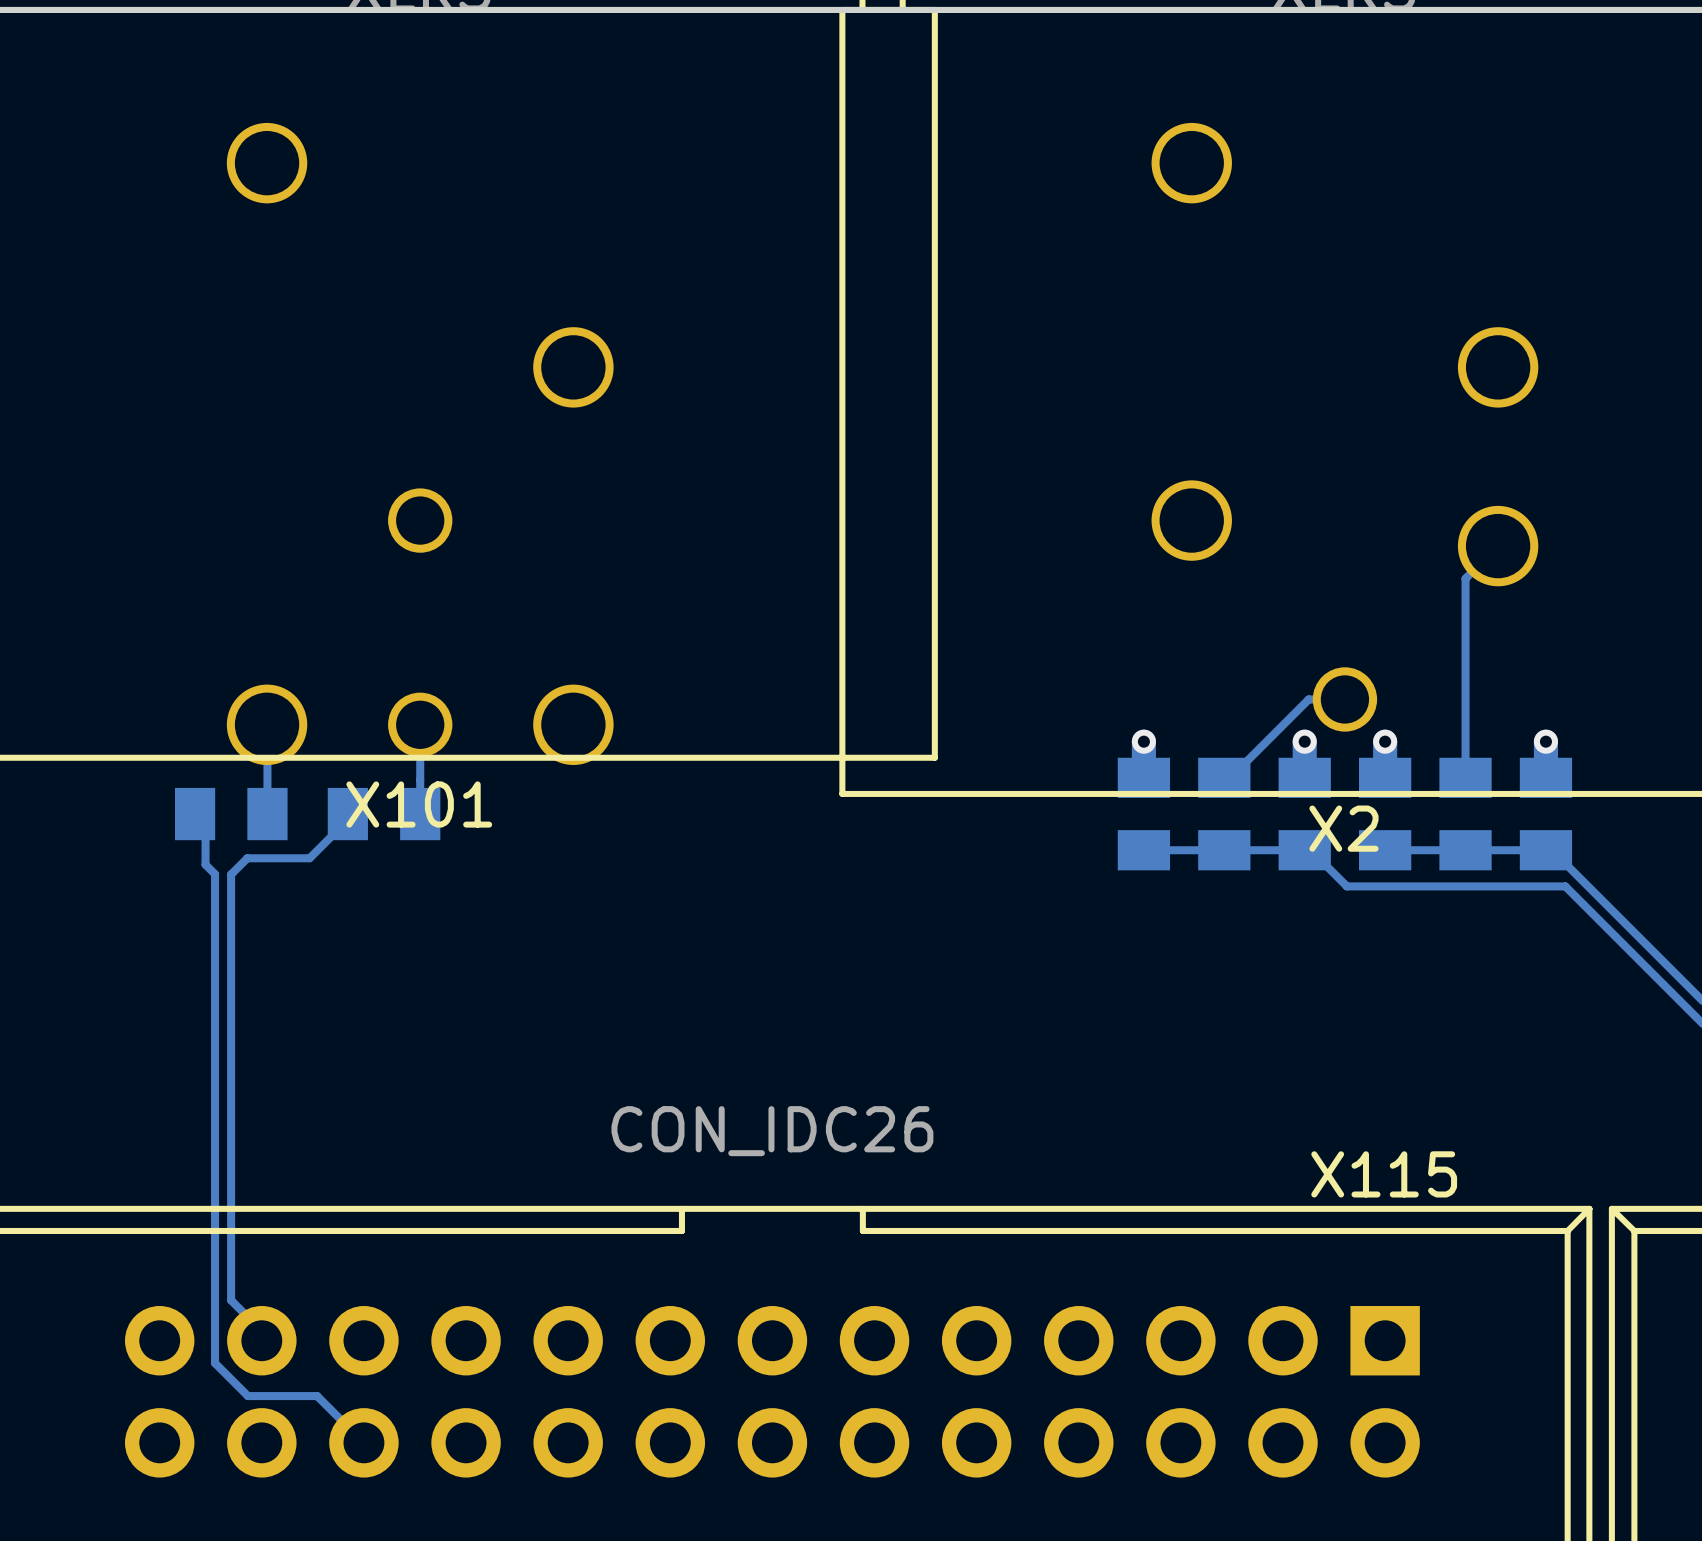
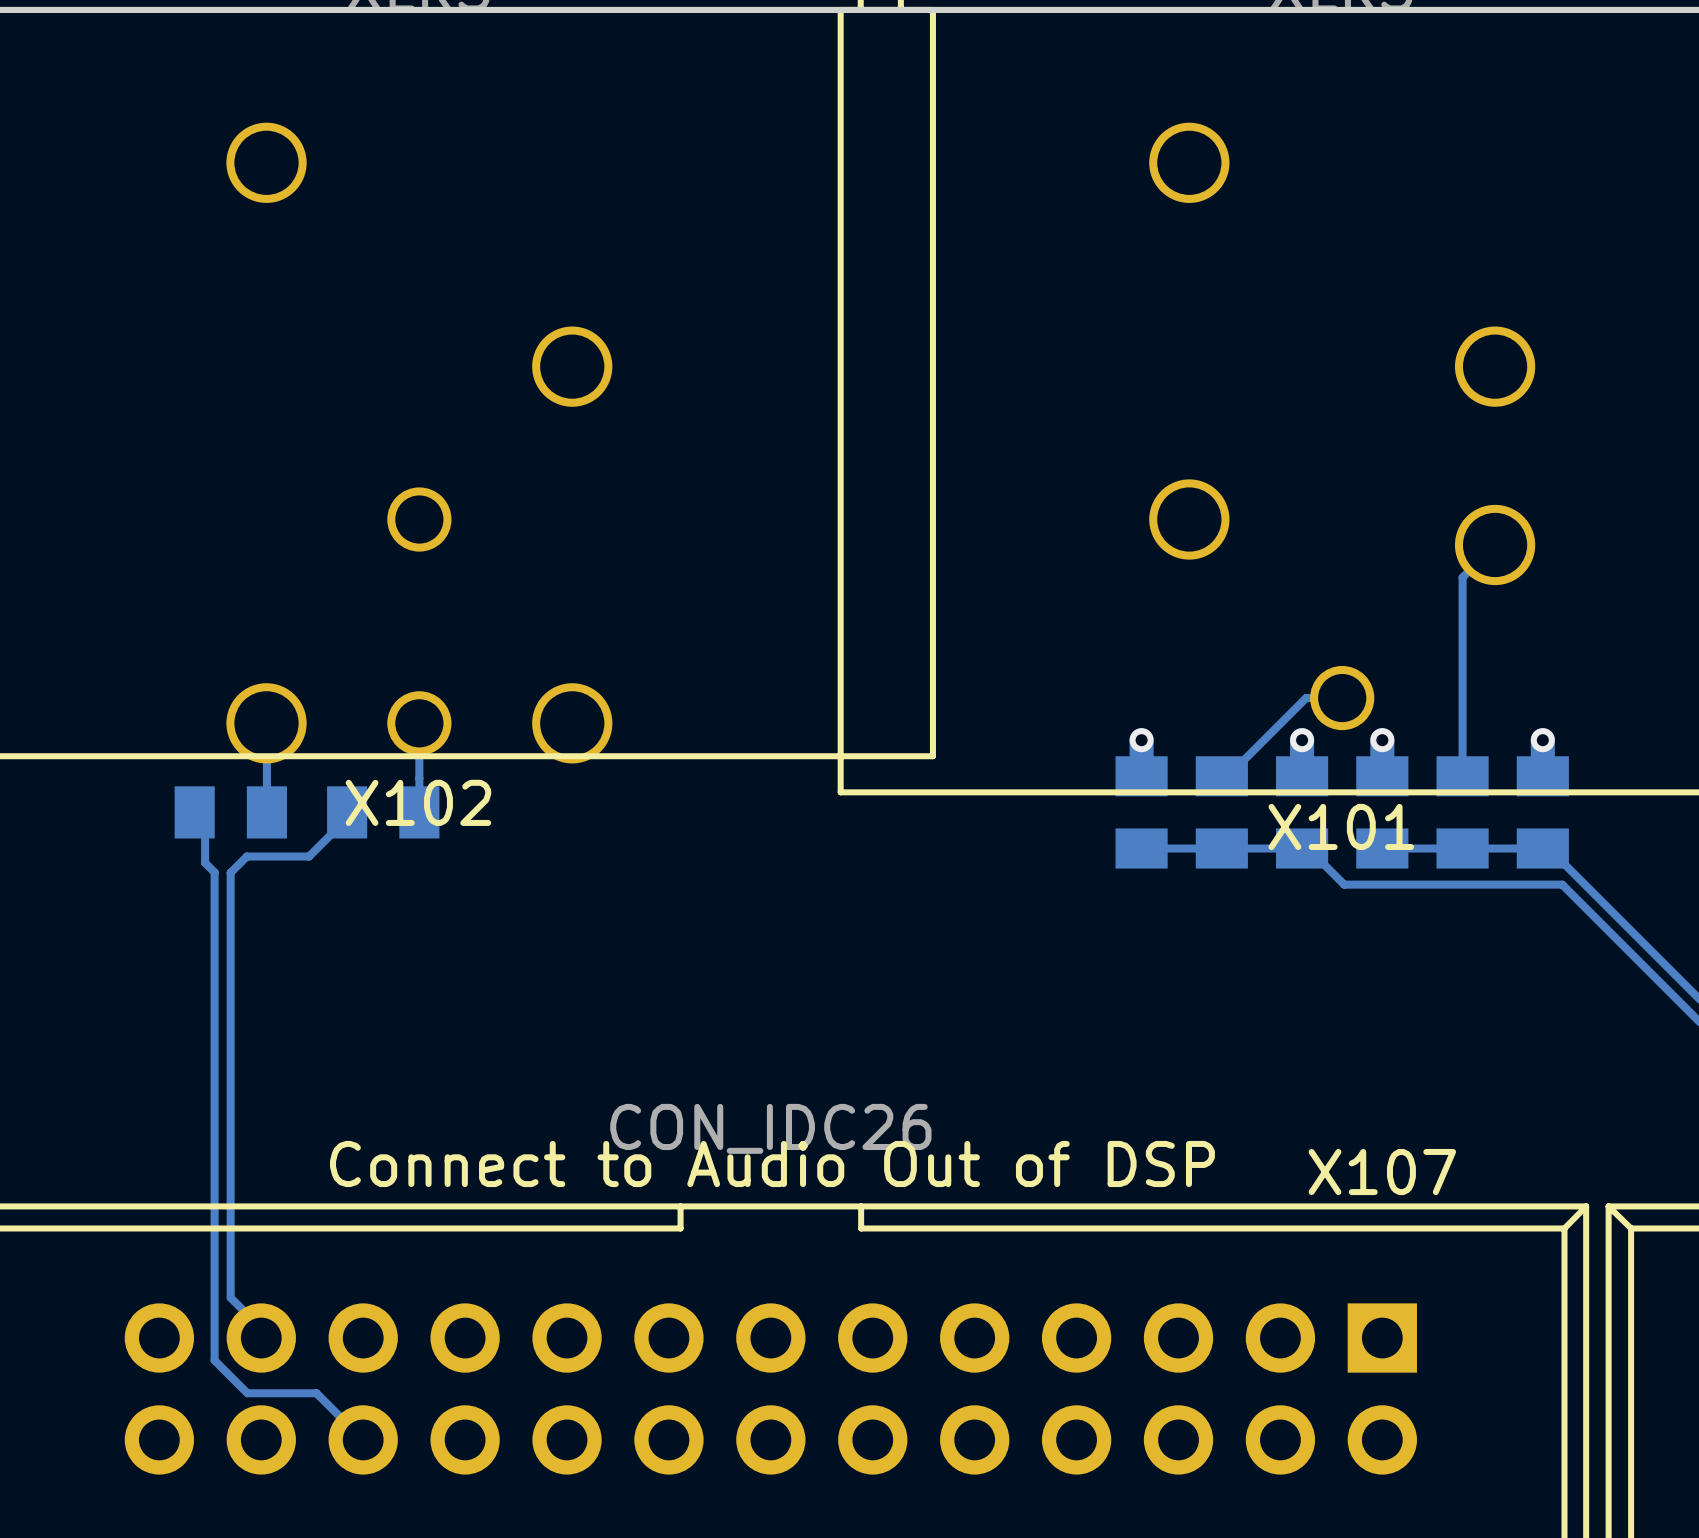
X101 name: X101 (419, 804) -> X102 (418, 802)
X2 name: X2 (1343, 828) -> X101 (1341, 826)
text: none -> Connect to Audio Out of DSP (772, 1163)
X115 name: X115 (1384, 1174) -> X107 (1382, 1172)

